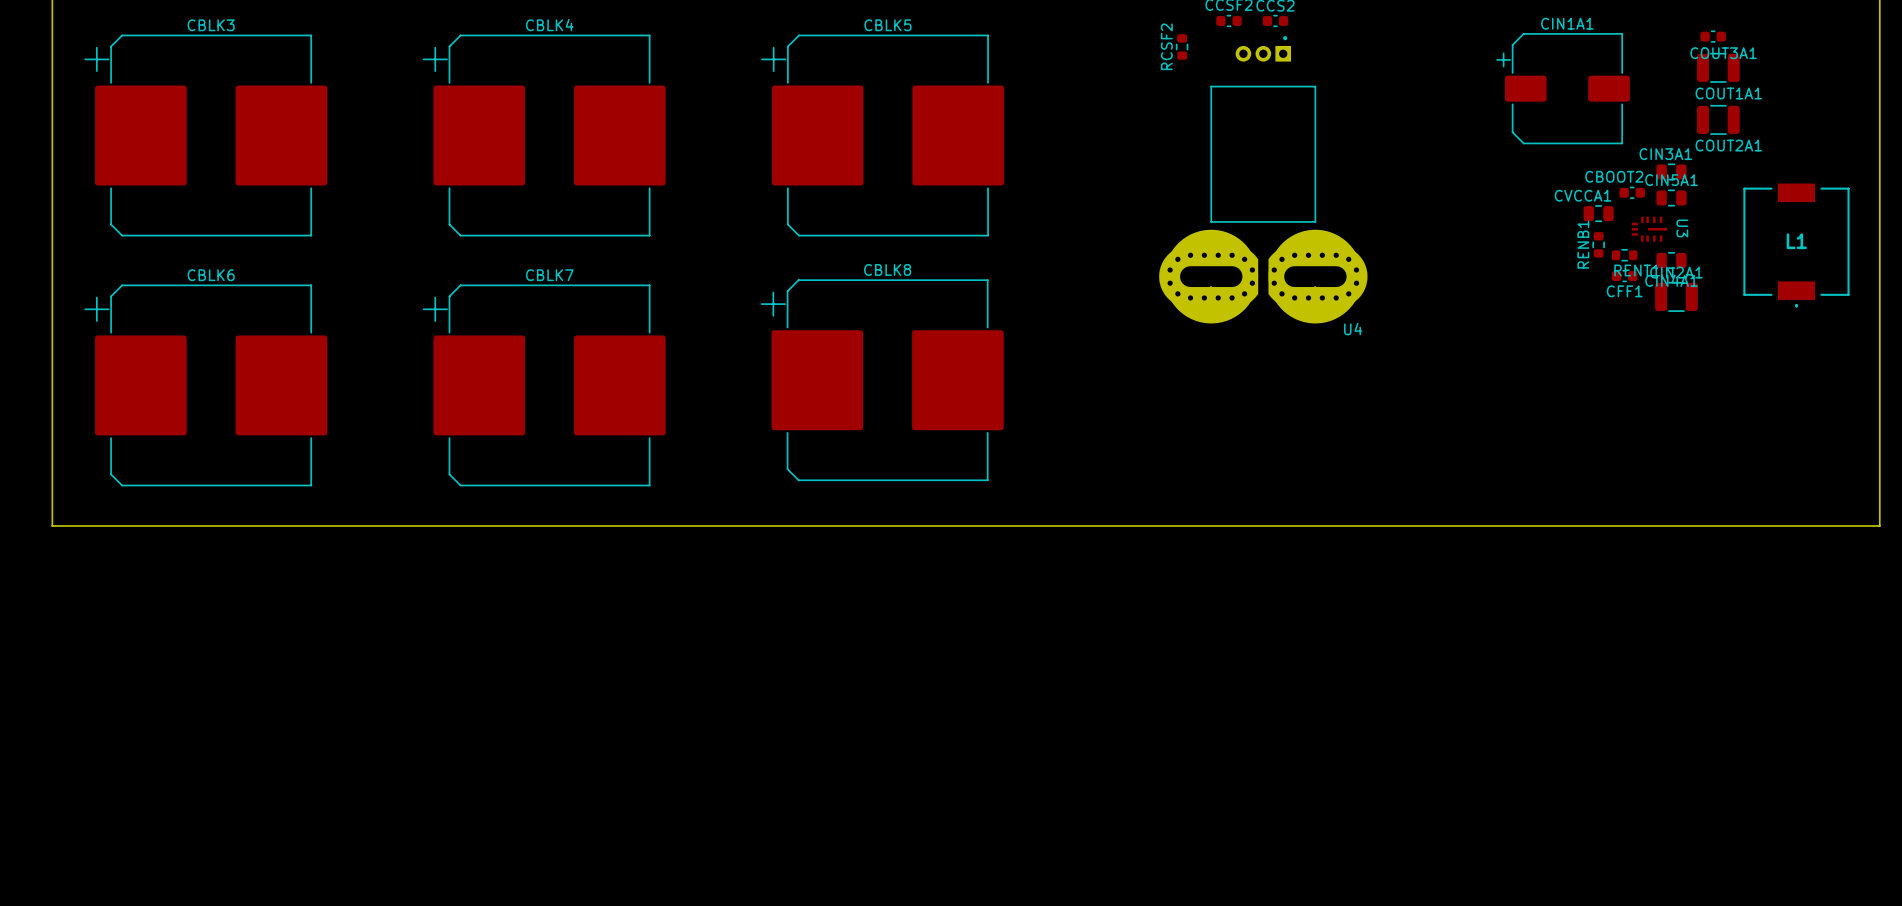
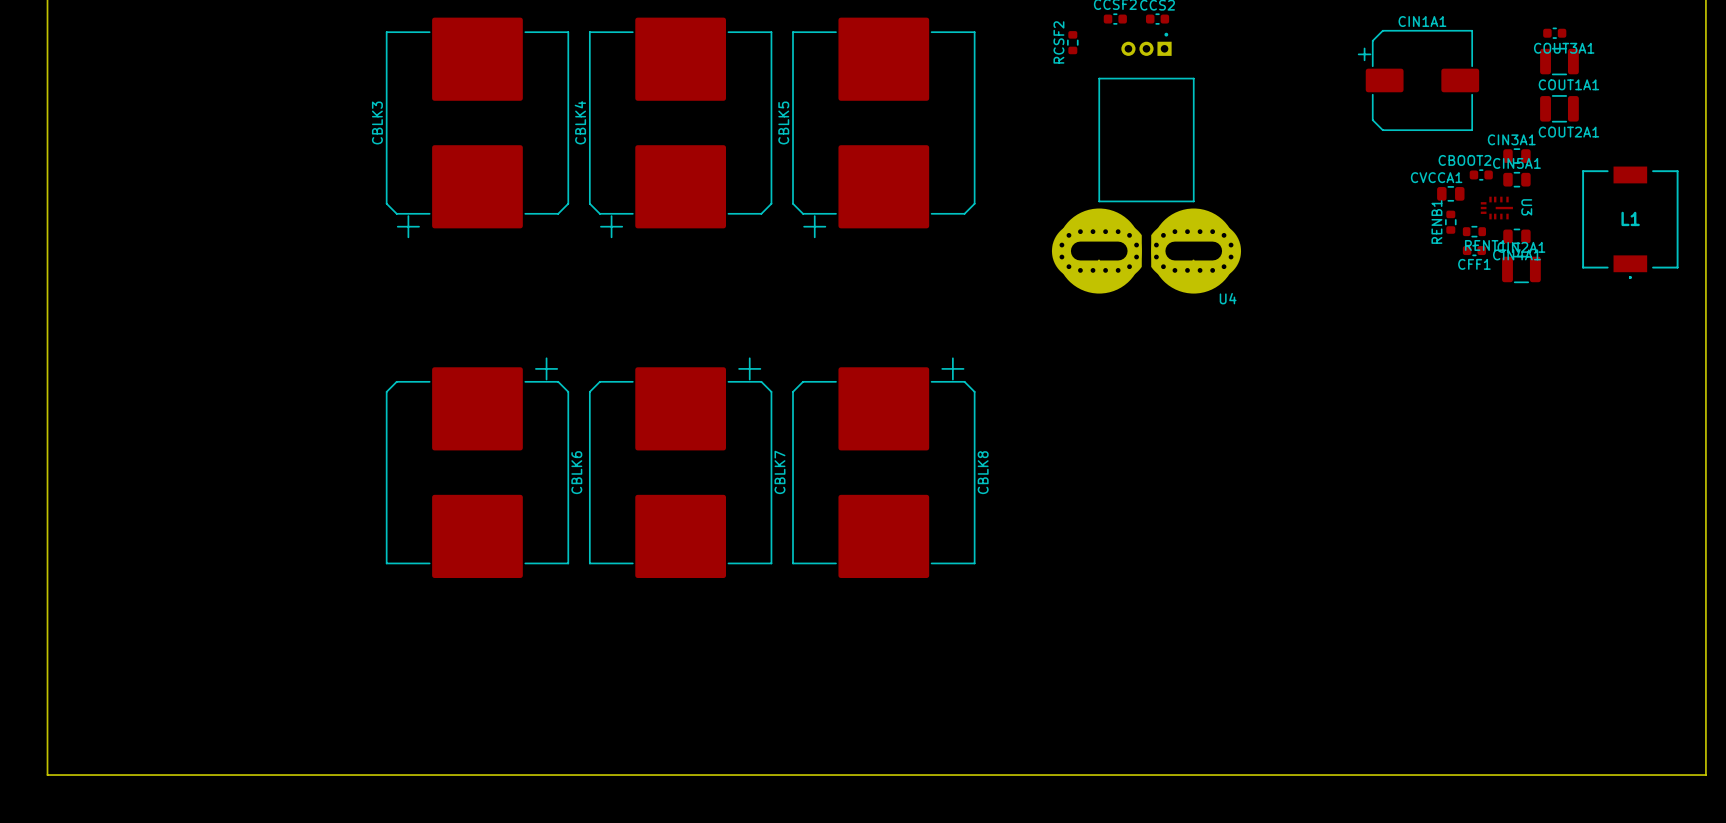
CBLK3 rotation: 0° (205, 135) -> 90° counterclockwise (477, 127)
CBLK3 position: (205, 135) -> (477, 127)
CBLK4 rotation: 0° (544, 135) -> 90° counterclockwise (680, 127)
CBLK4 position: (544, 135) -> (680, 127)
CBLK5 rotation: 0° (882, 135) -> 90° counterclockwise (883, 127)
CBLK8 rotation: 0° (882, 380) -> 90° clockwise (883, 467)
CBLK8 position: (882, 380) -> (883, 467)
CBLK6 rotation: 0° (205, 385) -> 90° clockwise (477, 467)
CBLK6 position: (205, 385) -> (477, 467)
CBLK7 rotation: 0° (544, 385) -> 90° clockwise (680, 467)
CBLK7 position: (544, 385) -> (680, 467)
board edge: (52, 525) (1879, 525) -> (47, 477) (47, 775) (1705, 775) (1705, 477)

